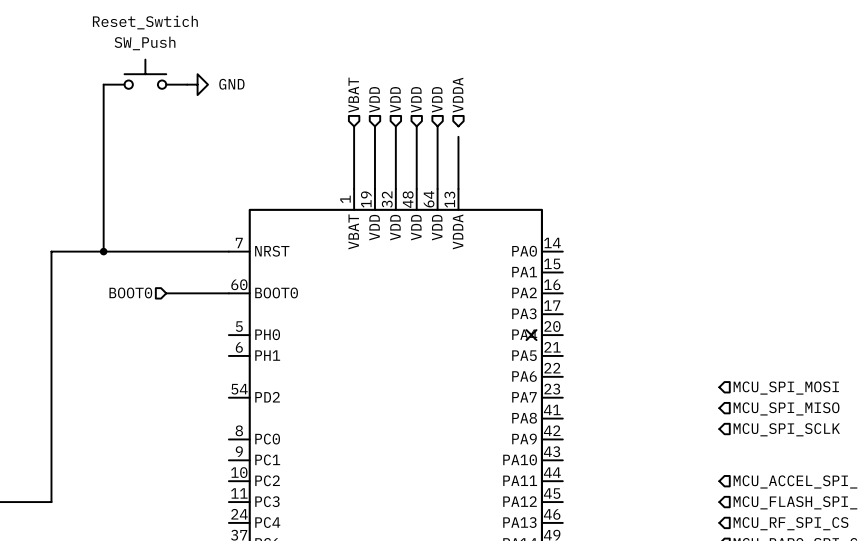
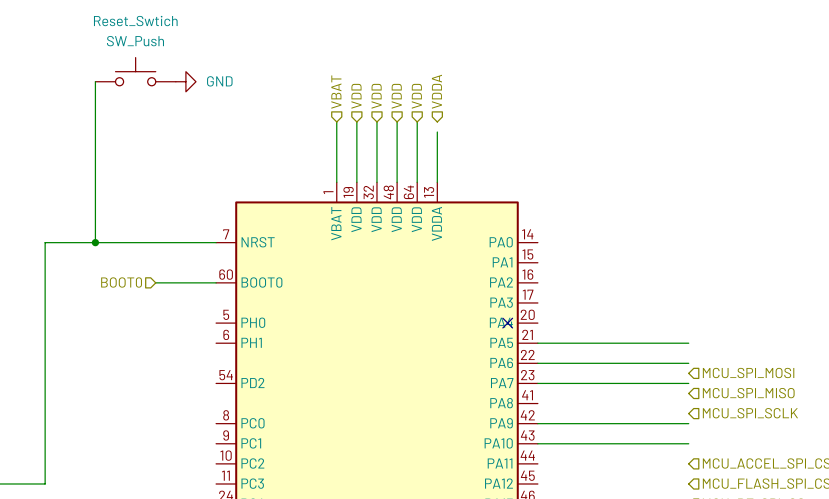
wire: none -> (537, 343) (688, 343)
wire: none -> (537, 363) (688, 363)
wire: none -> (537, 383) (688, 383)
wire: none -> (537, 423) (688, 423)
wire: none -> (537, 443) (688, 443)

